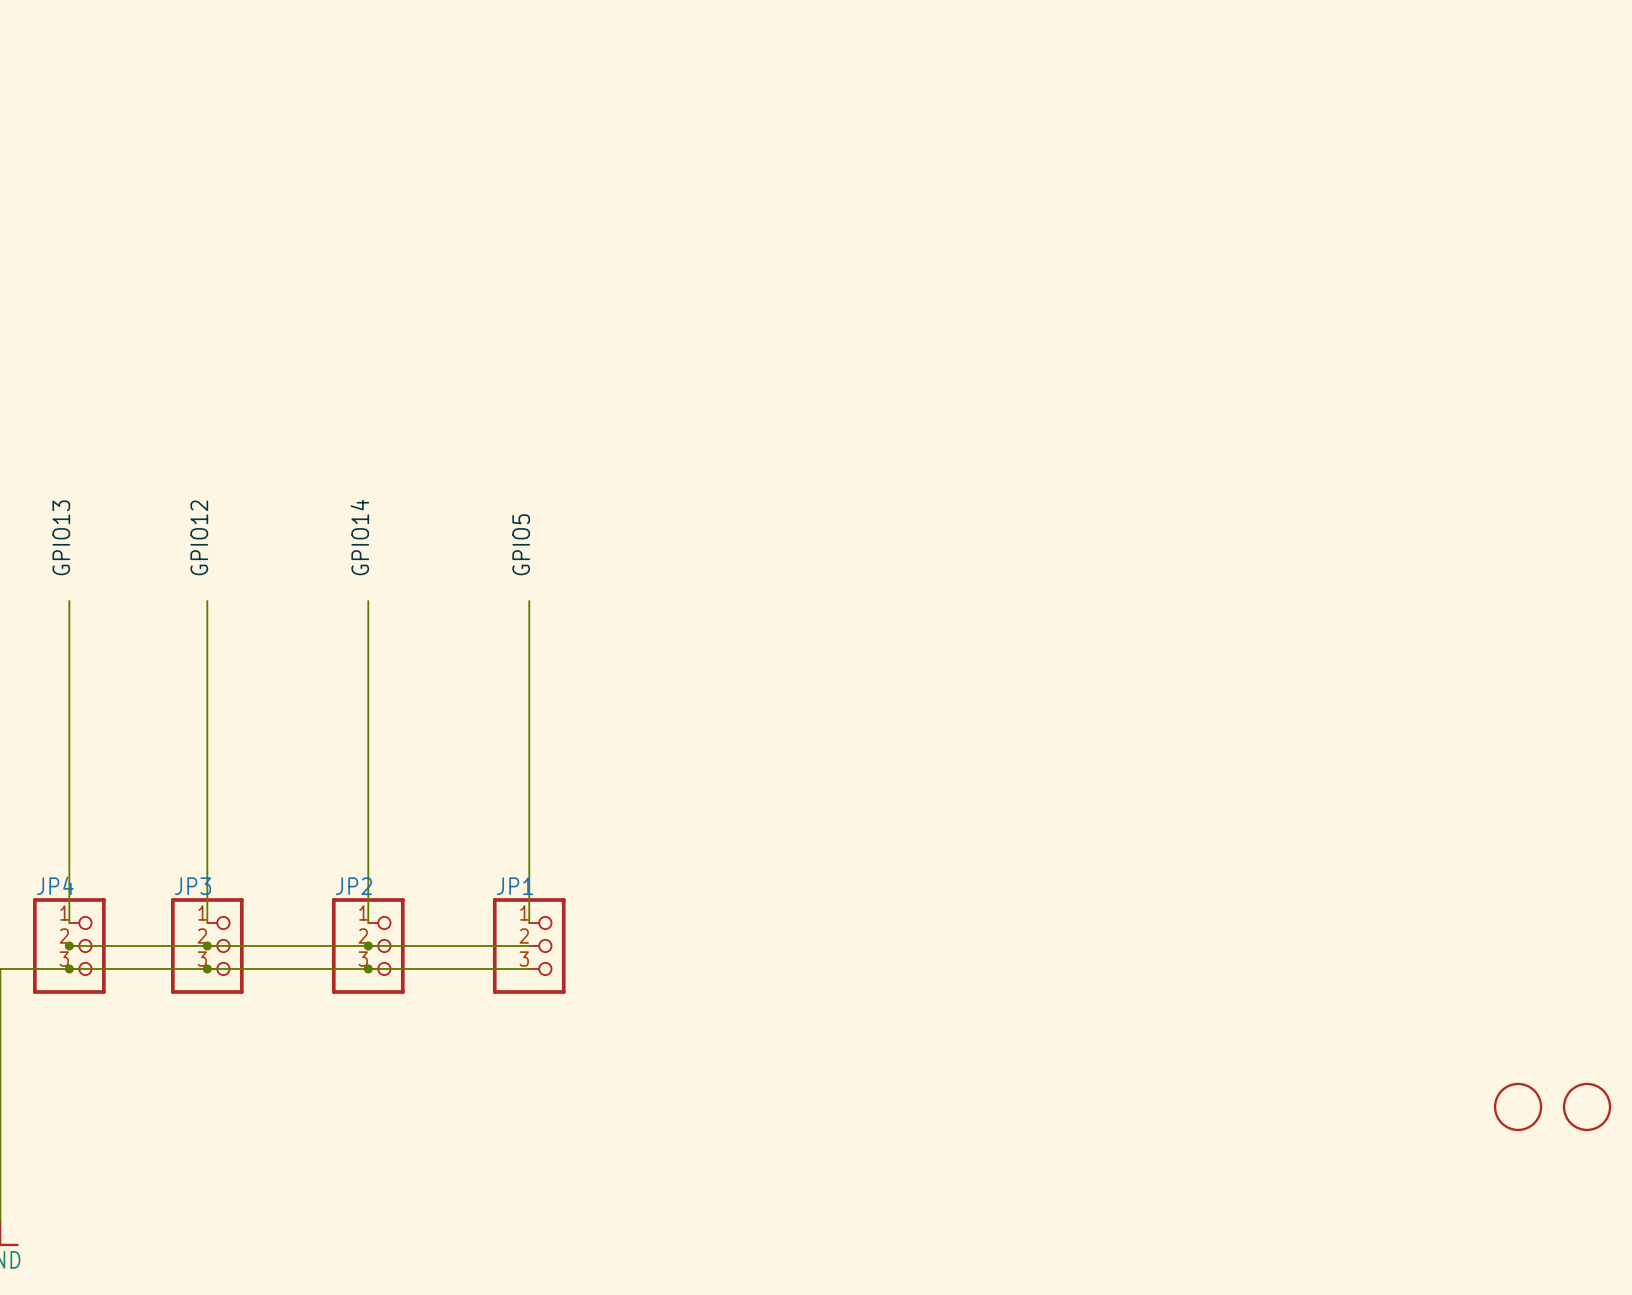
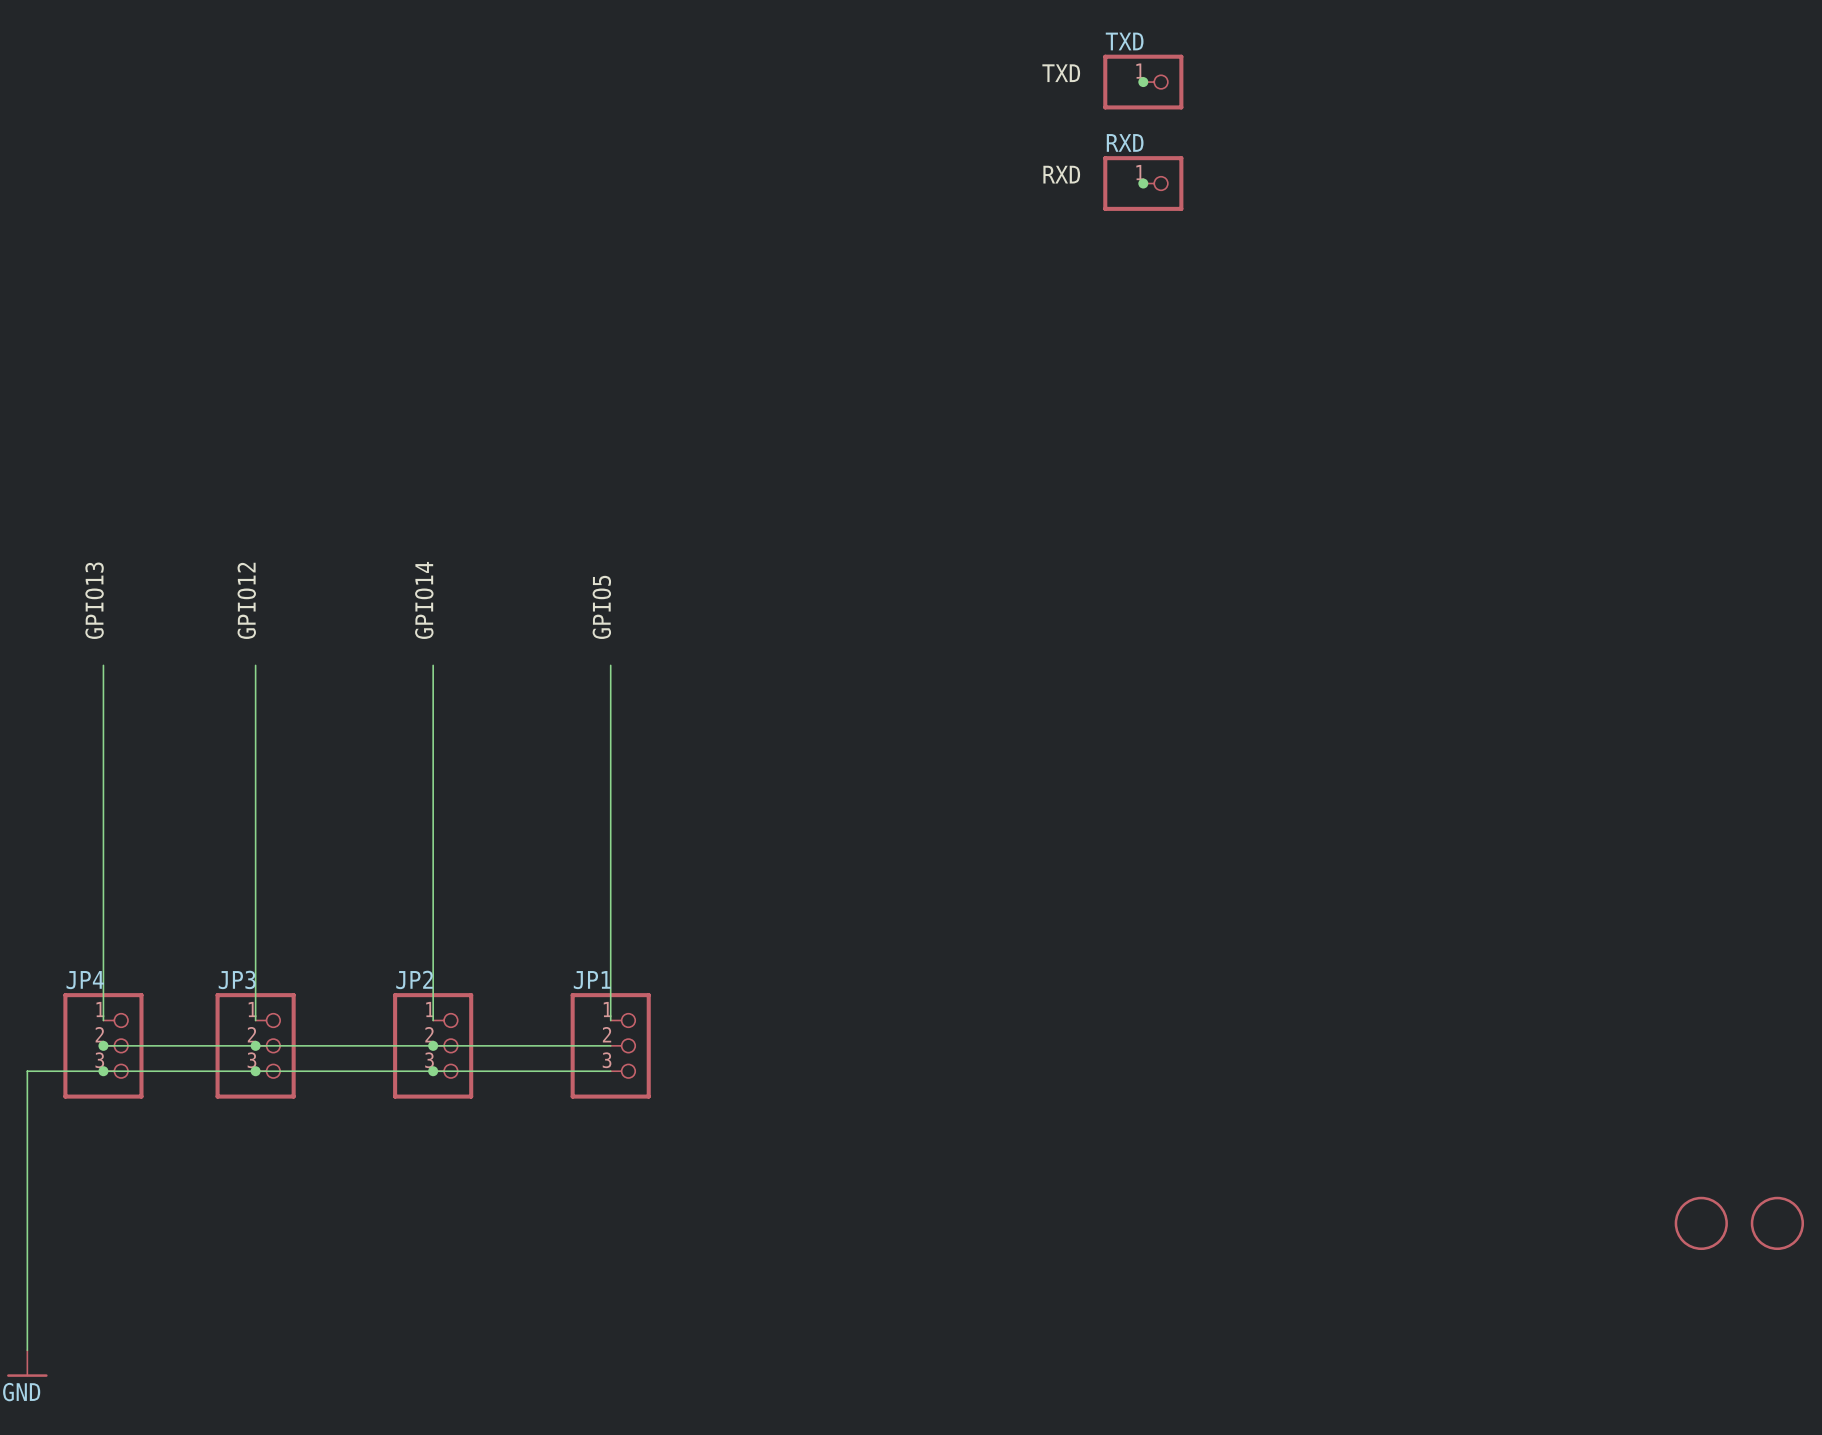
label: none -> TXD (1061, 73)
TXD: none -> (1143, 82)
junction: none -> (1143, 82)
label: none -> RXD (1061, 174)
RXD: none -> (1143, 183)
junction: none -> (1143, 183)

